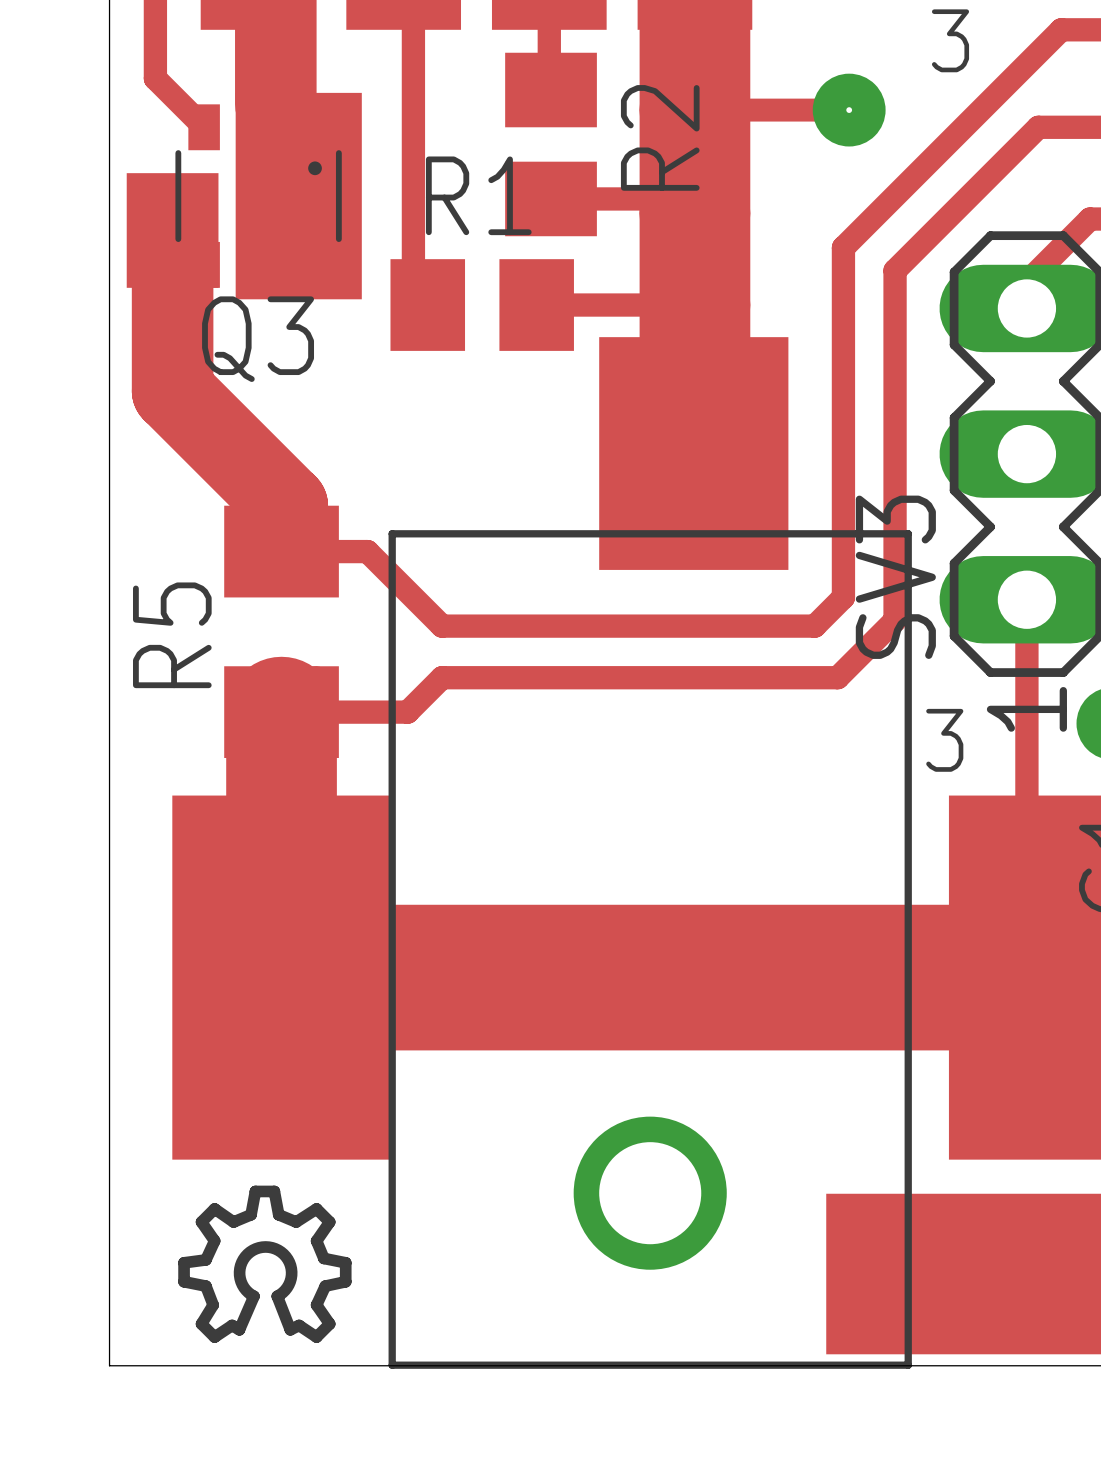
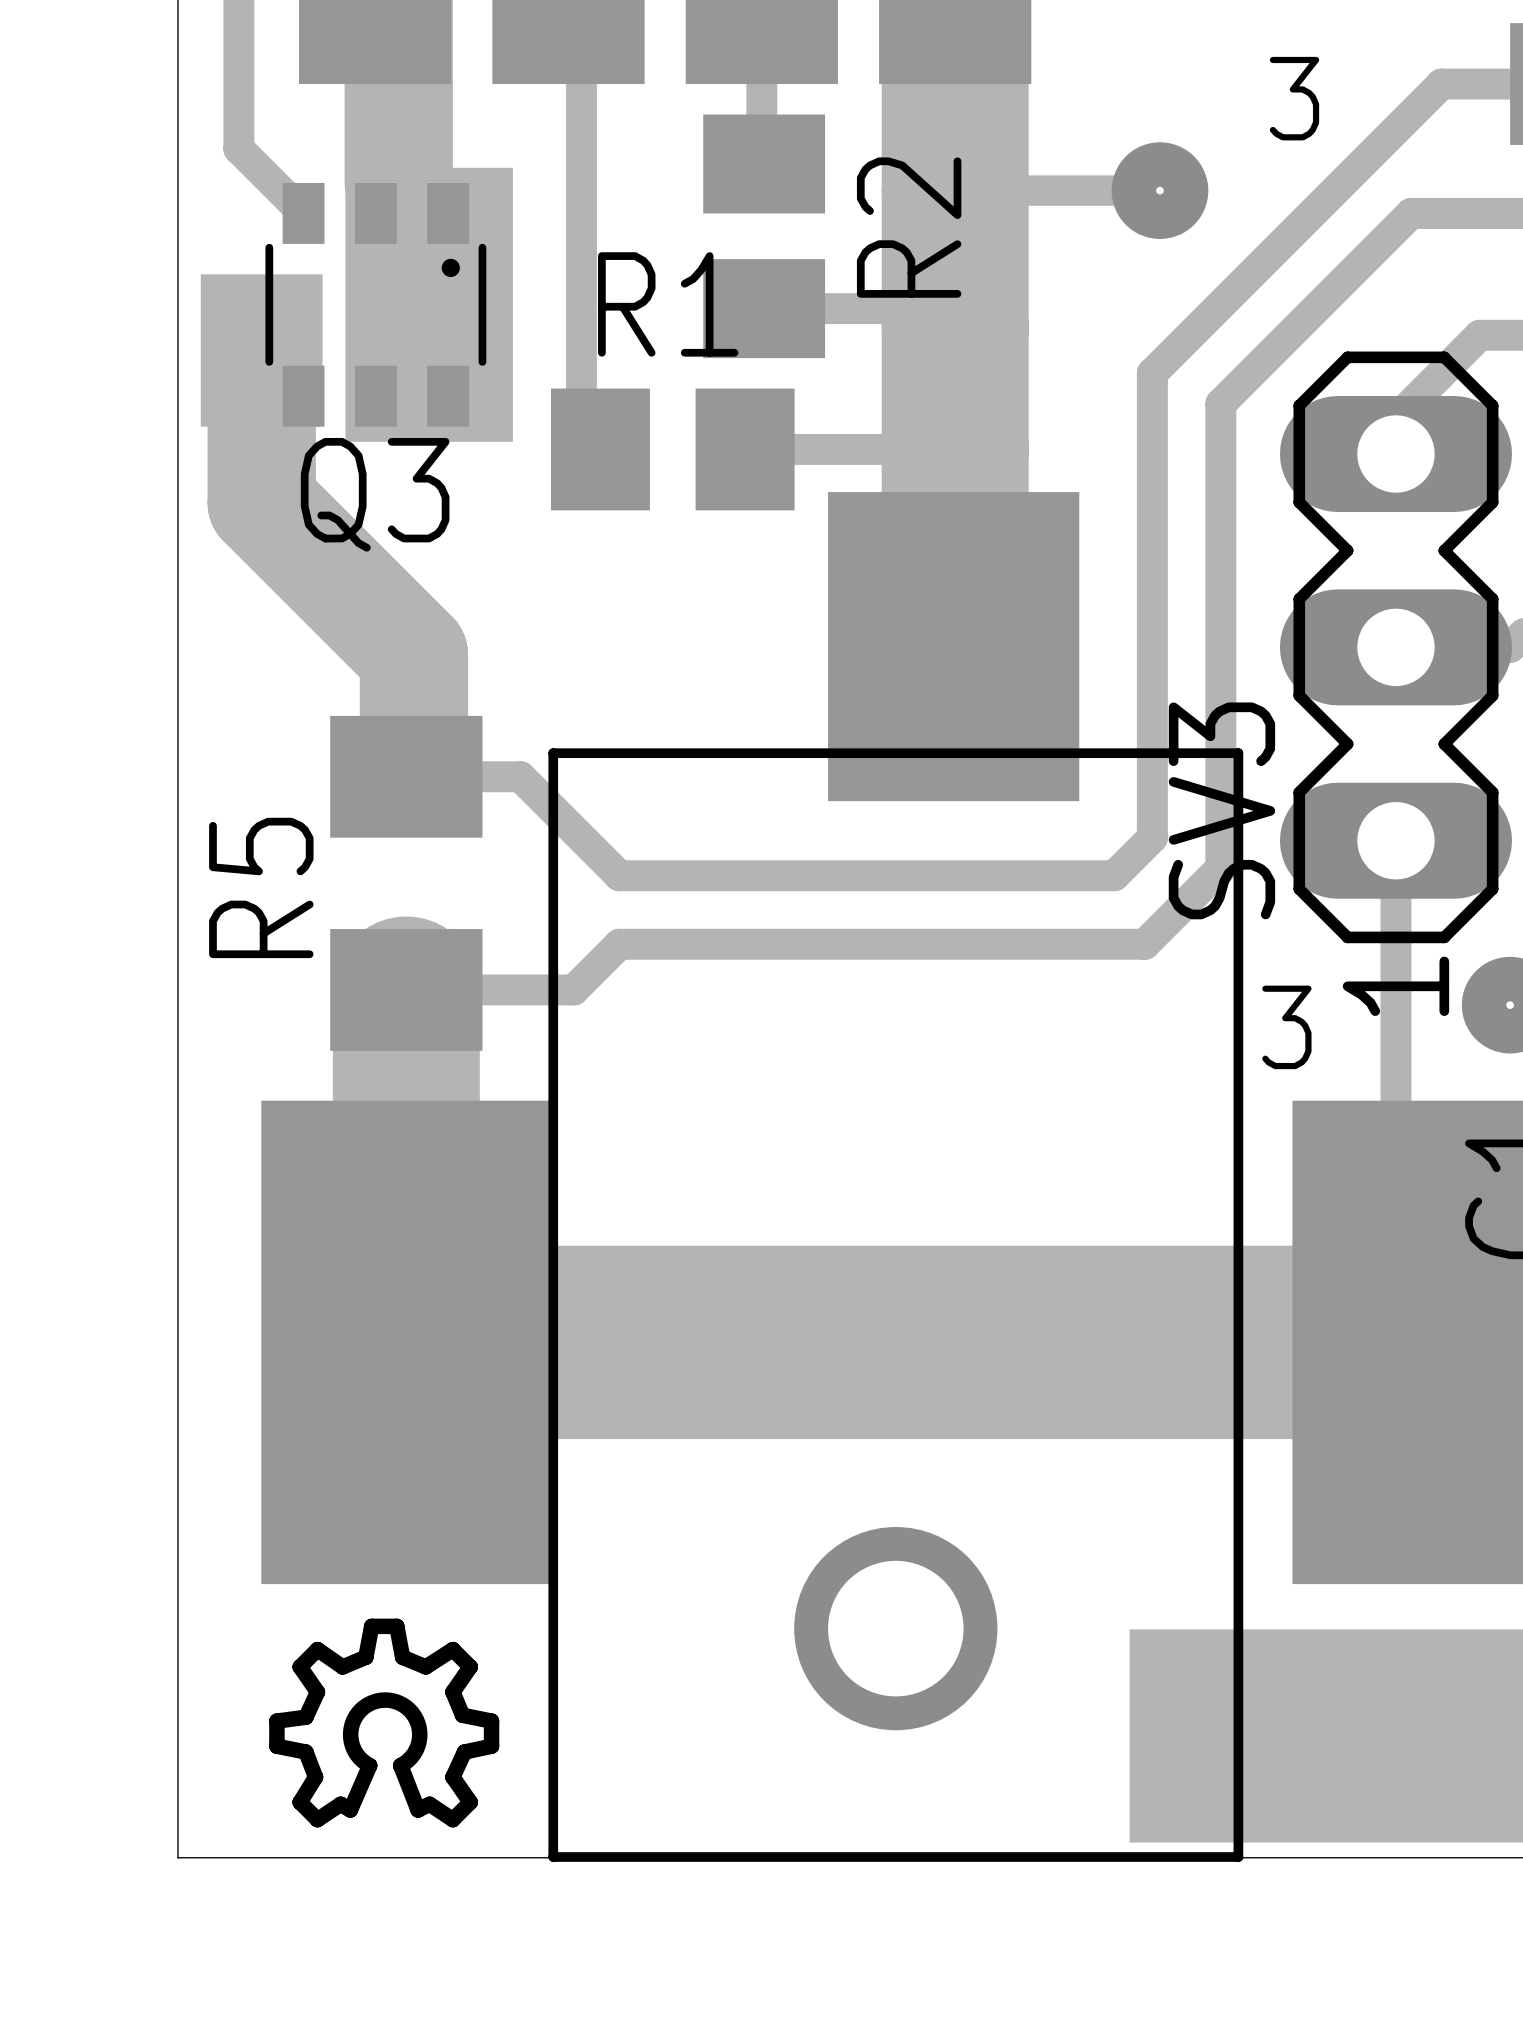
track: (172, 345) (172, 391) (287, 505) -> (261, 502) (413, 654) (413, 715)

